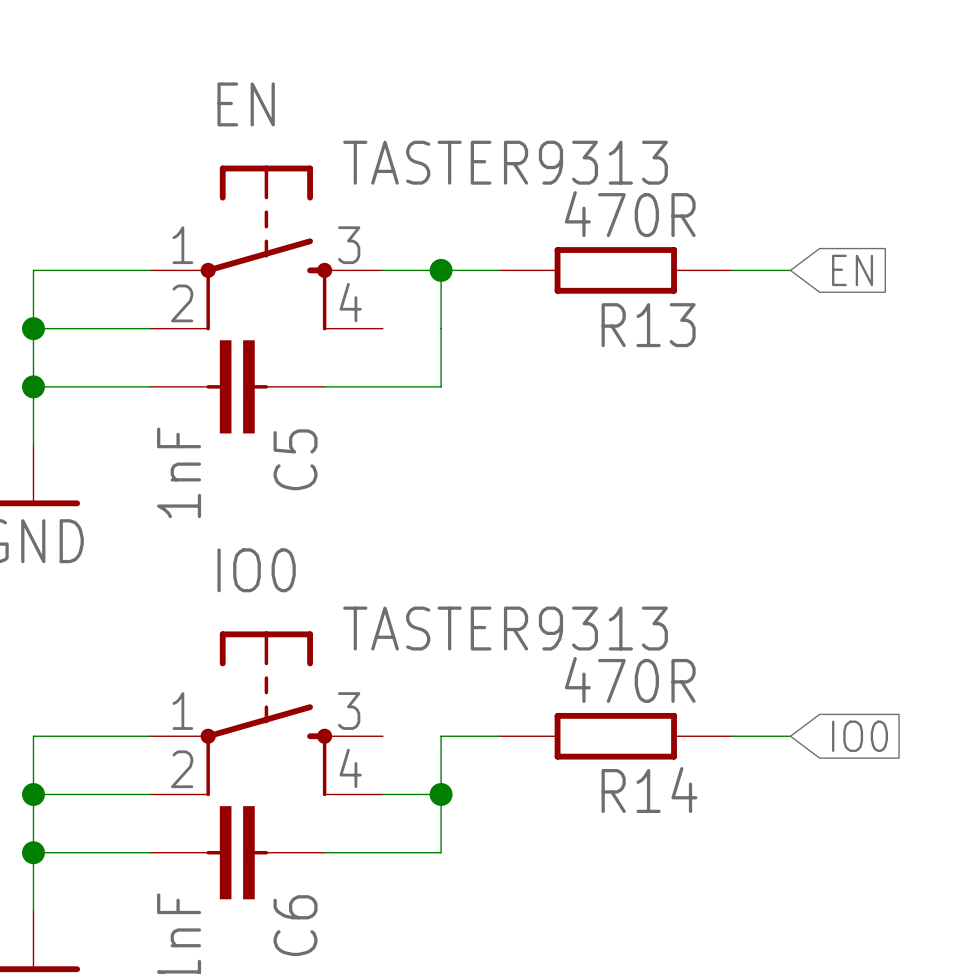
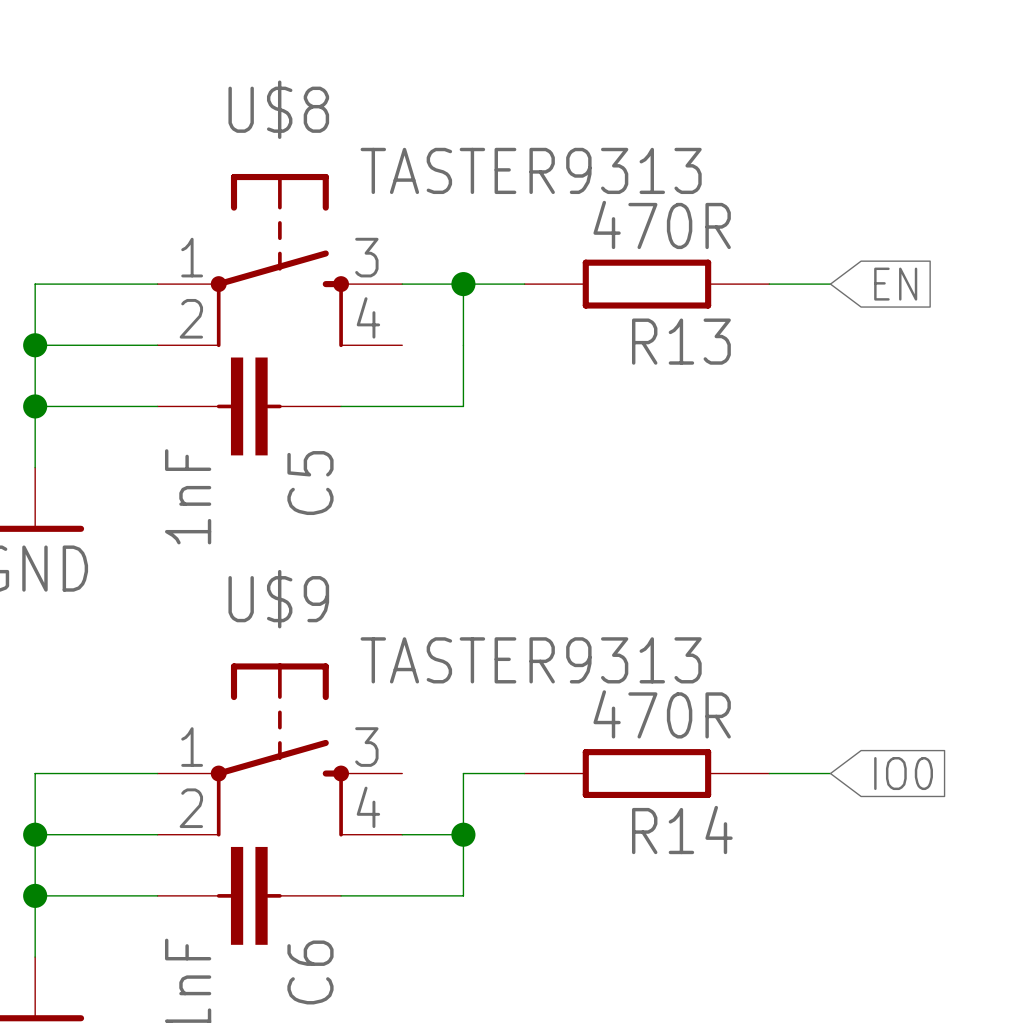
EN name: EN (246, 104) -> U$8 (278, 109)
IO0 name: IO0 (256, 570) -> U$9 (278, 599)

